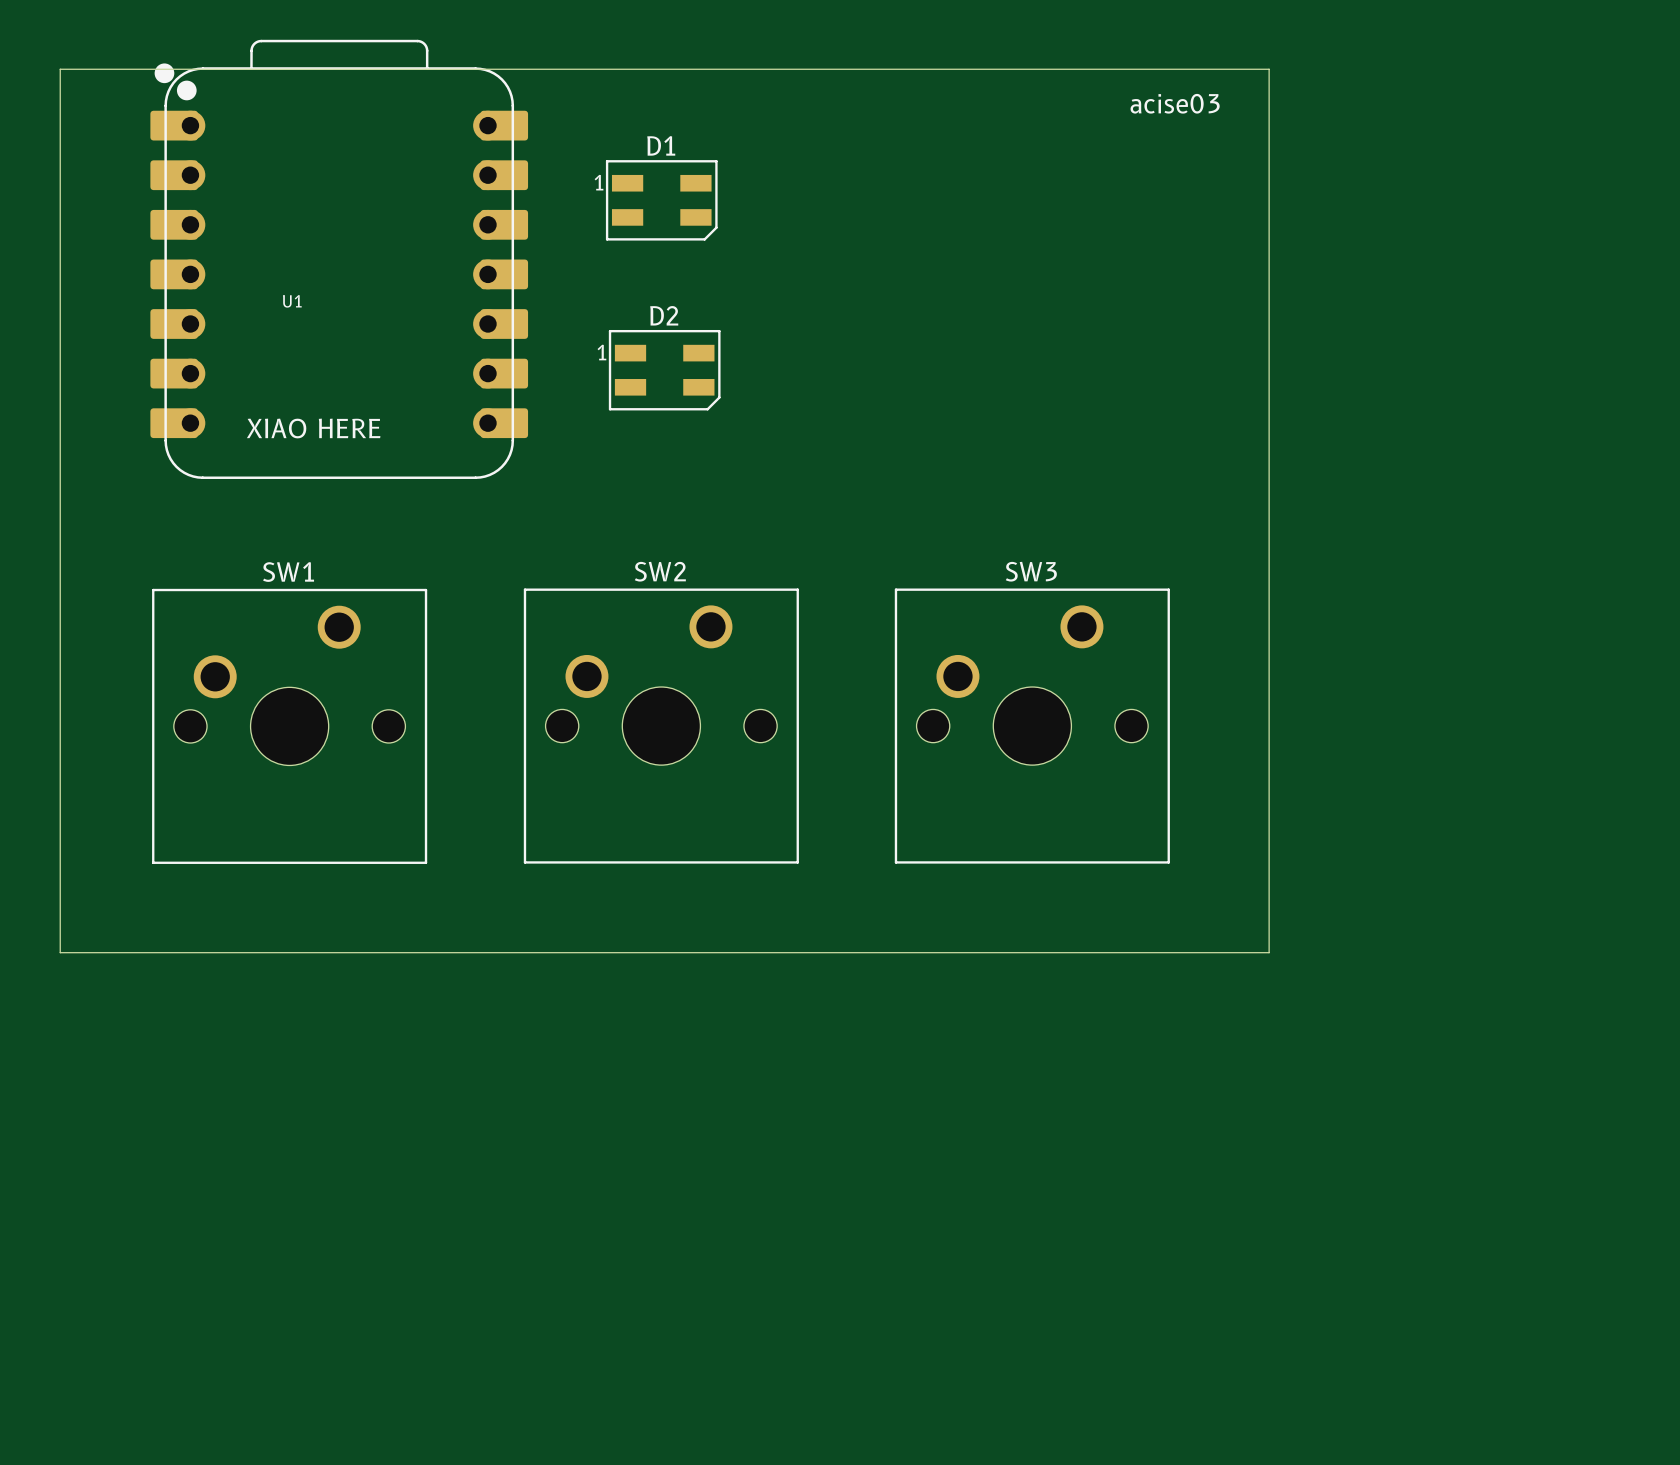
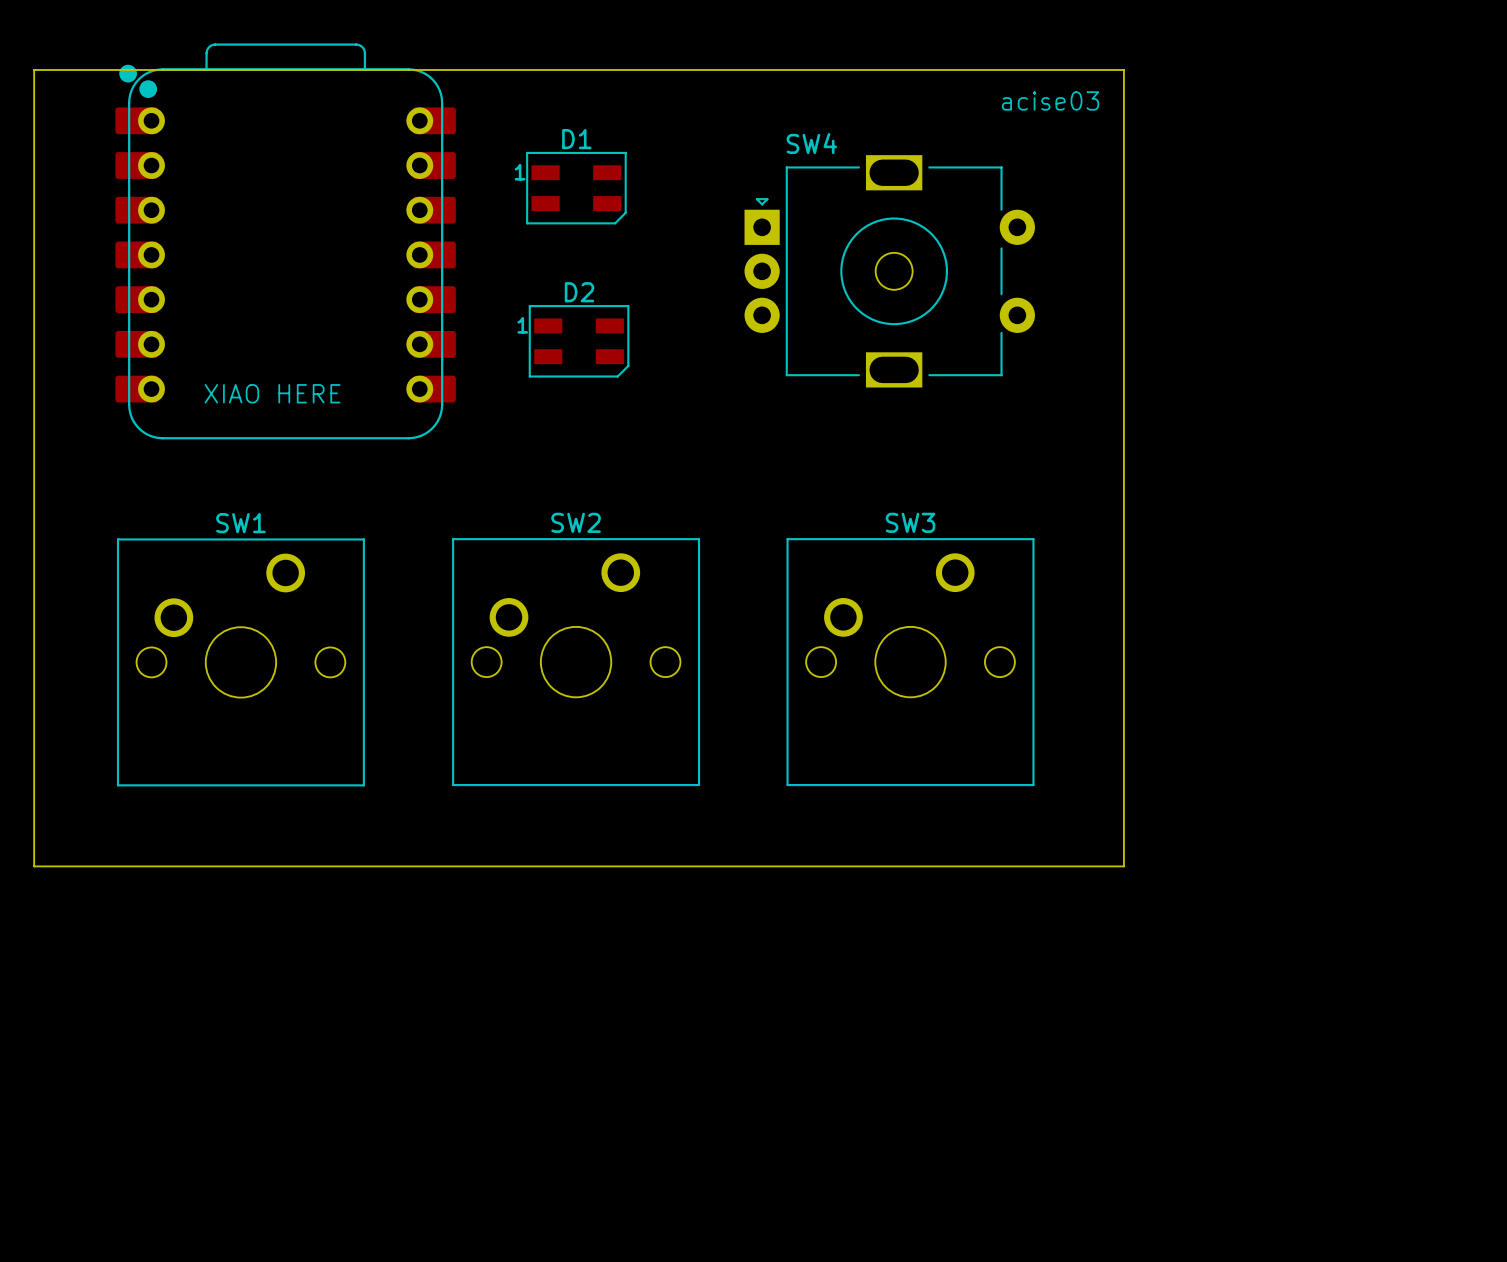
SW4: none -> (889, 271)
U1 name: U1 (292, 301) -> none

